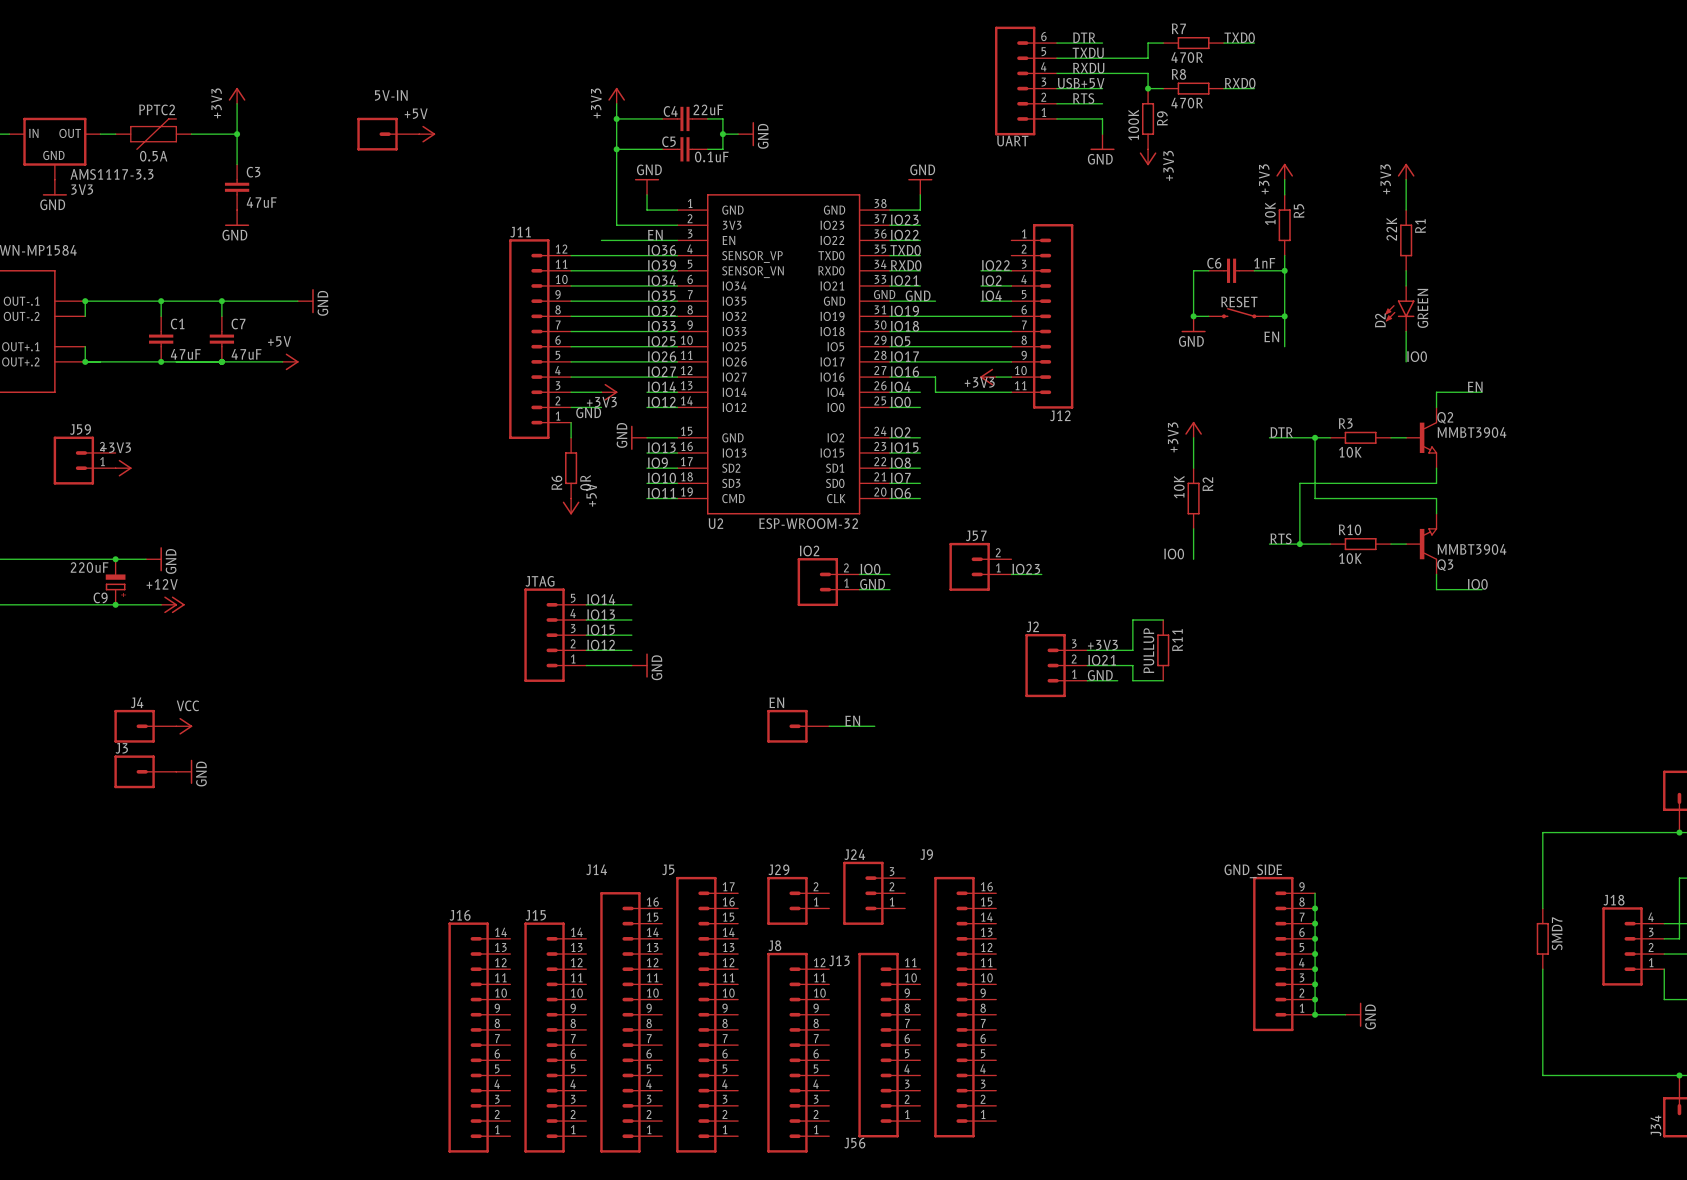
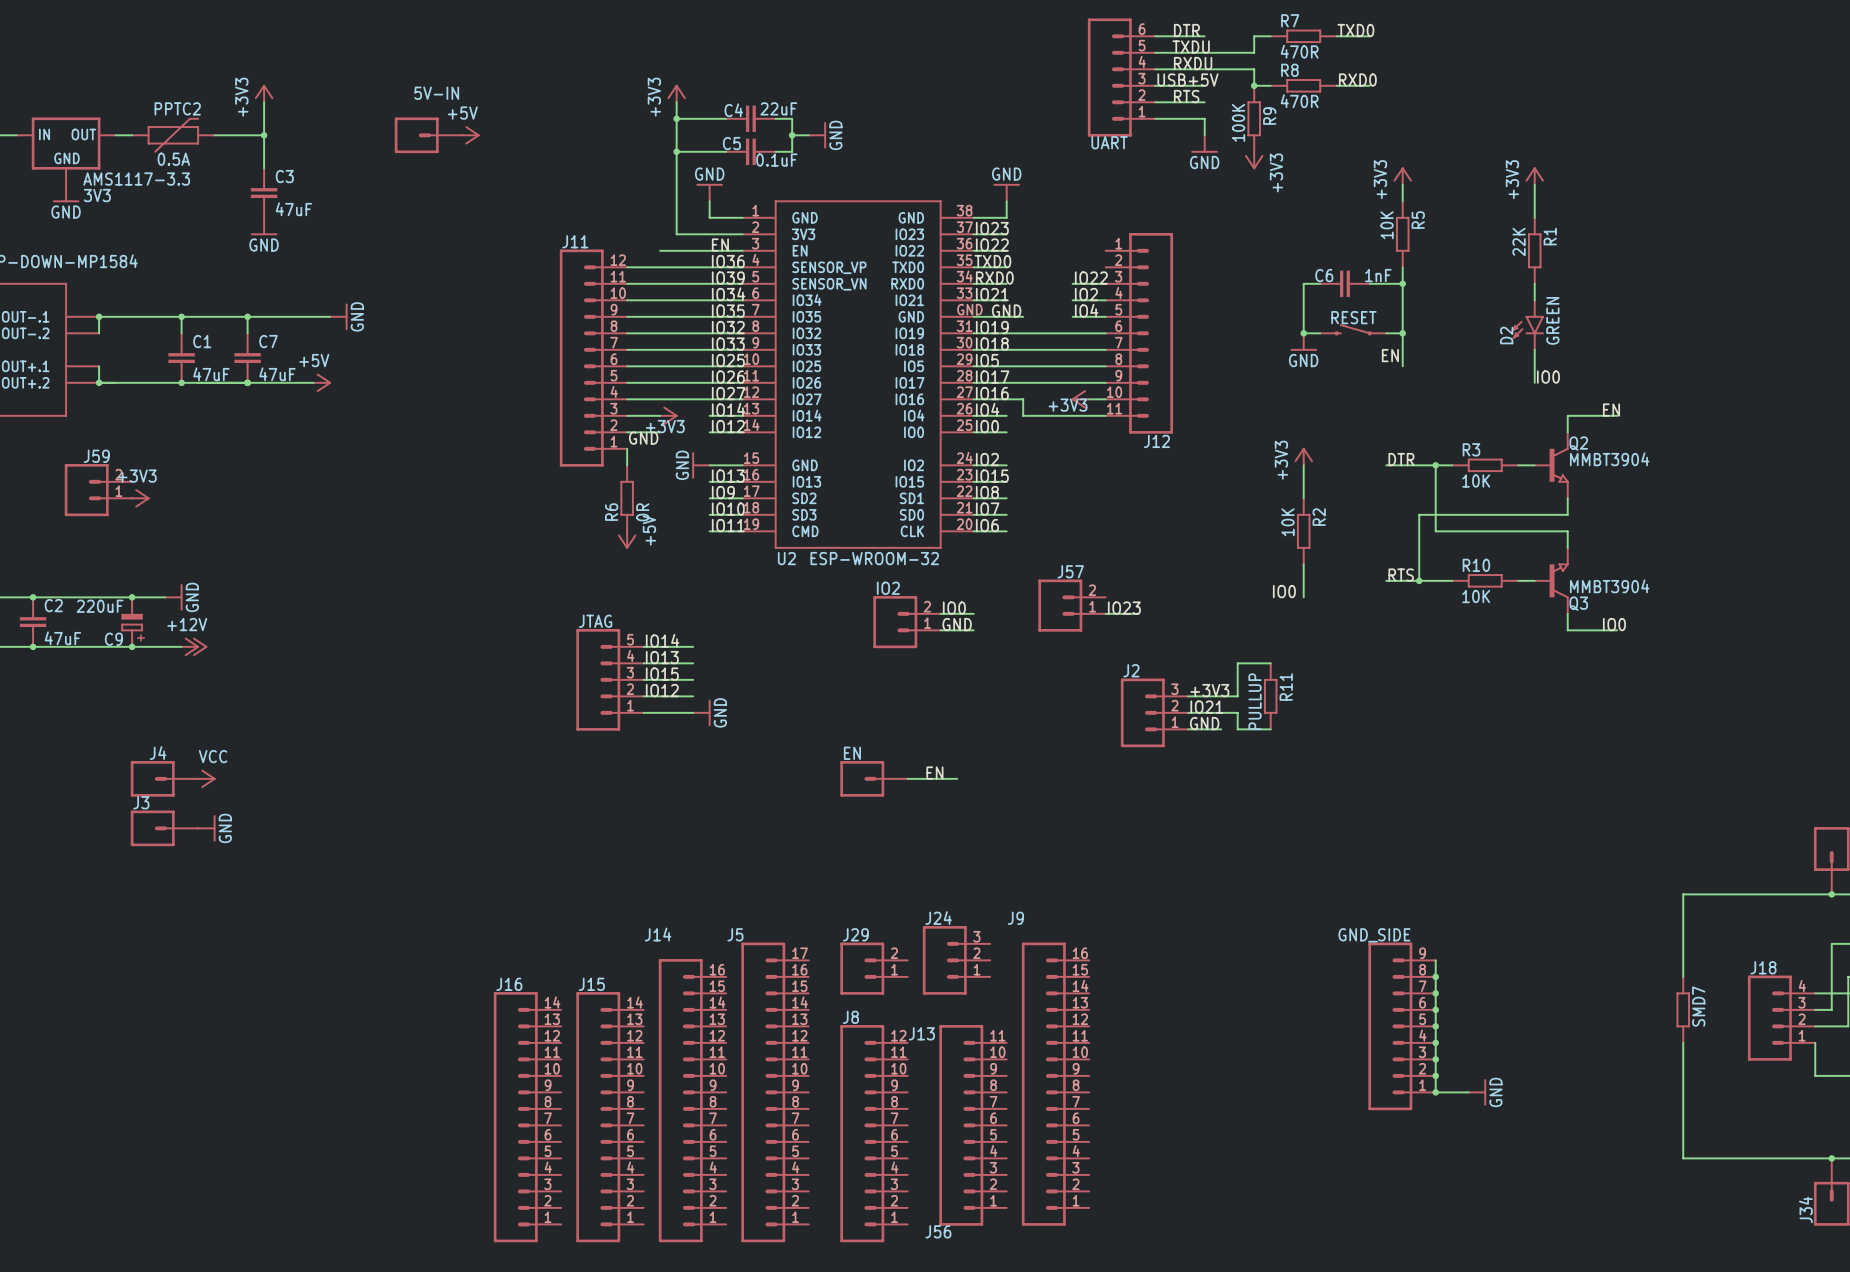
junction: none -> (33, 597)
C2: none -> 47uF (33, 622)
junction: none -> (33, 646)

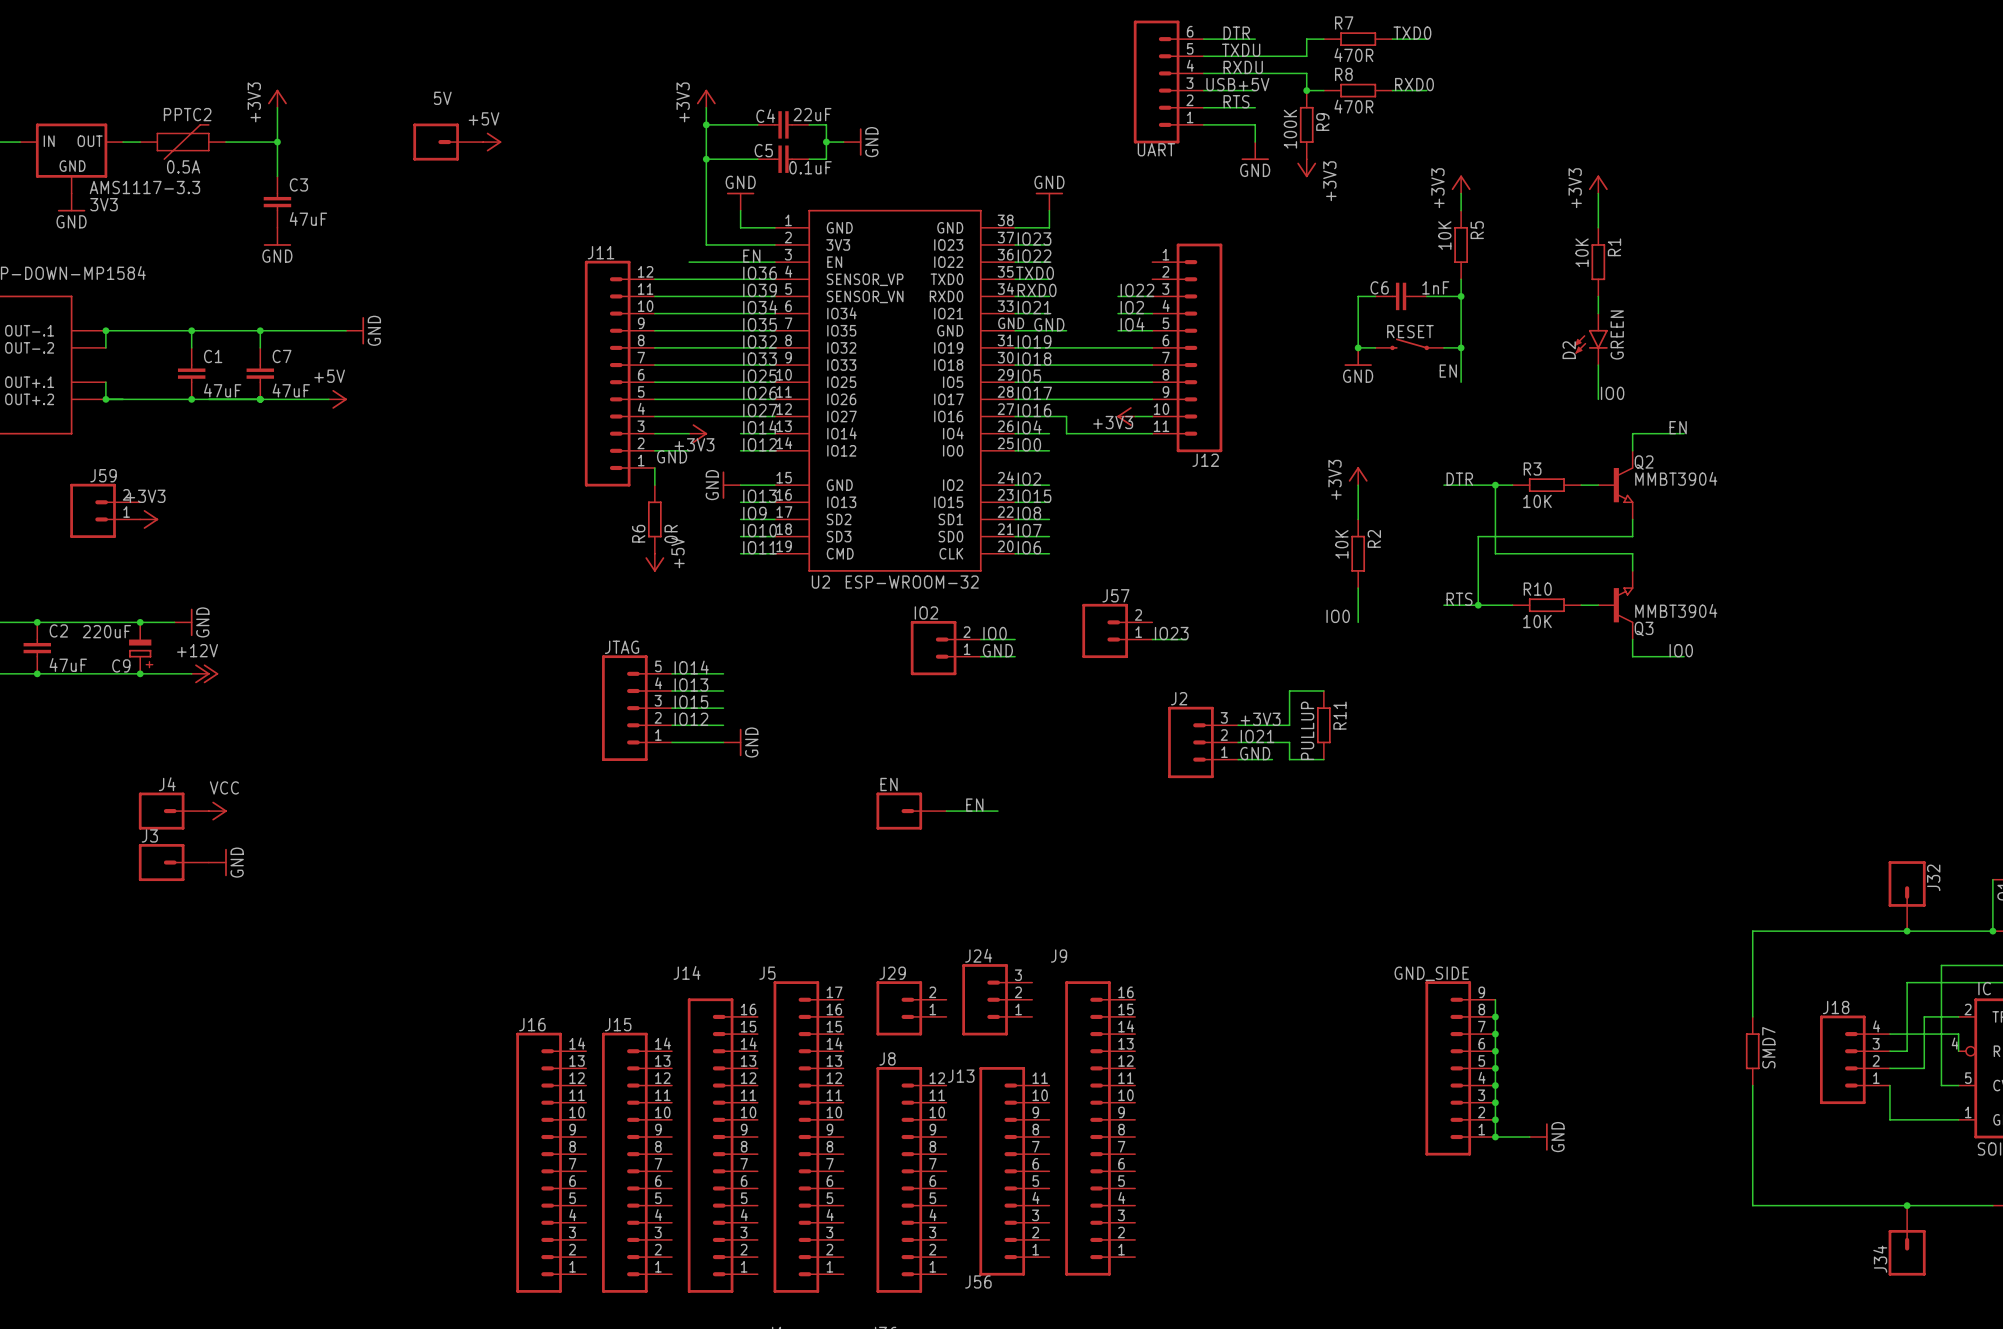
5V-IN name: 5V-IN (436, 93) -> 5V (442, 98)
R1 value: 22K (1519, 242) -> 10K (1582, 252)

